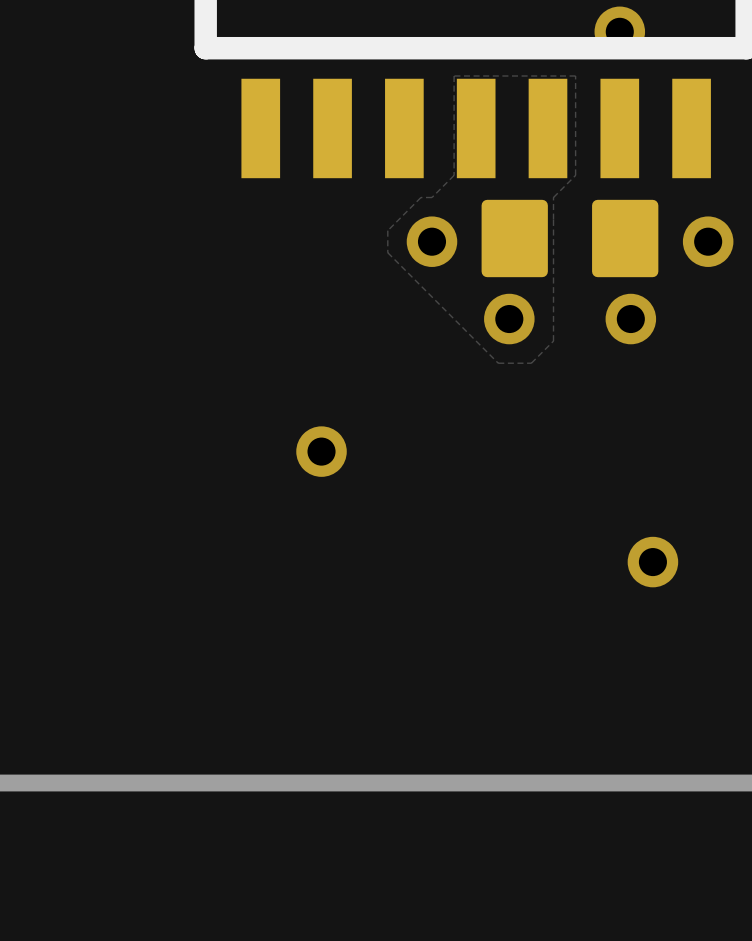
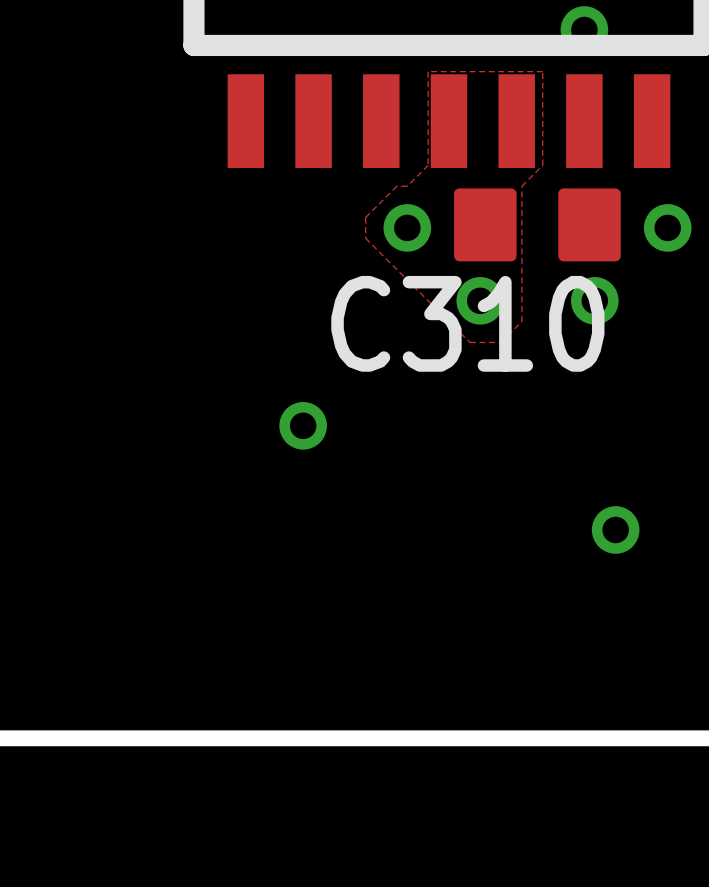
C310 name: none -> C310 (467, 323)

